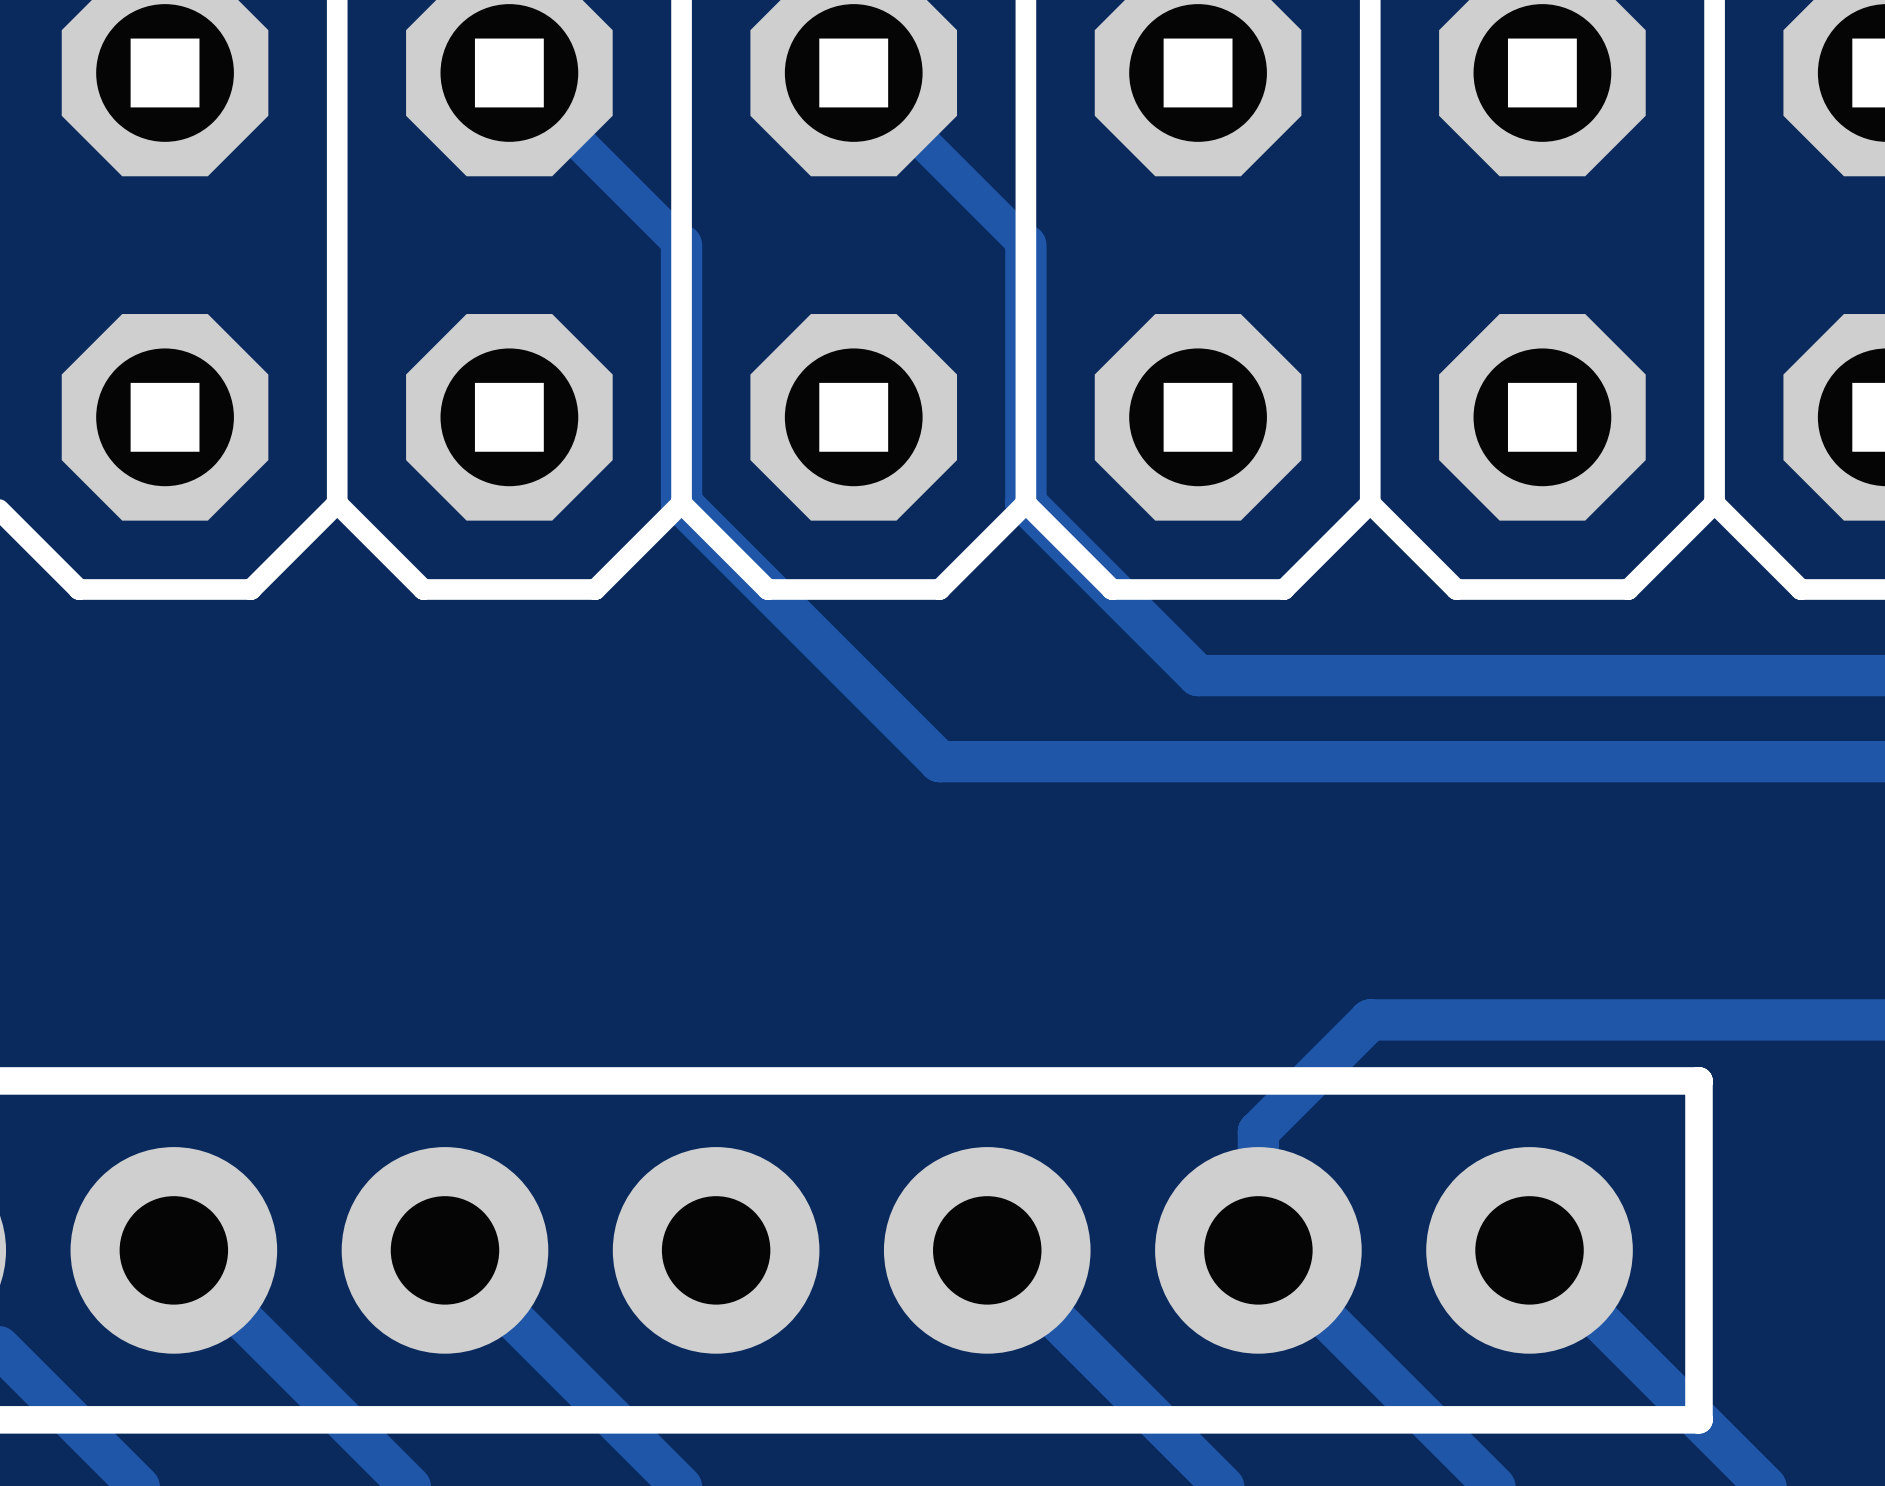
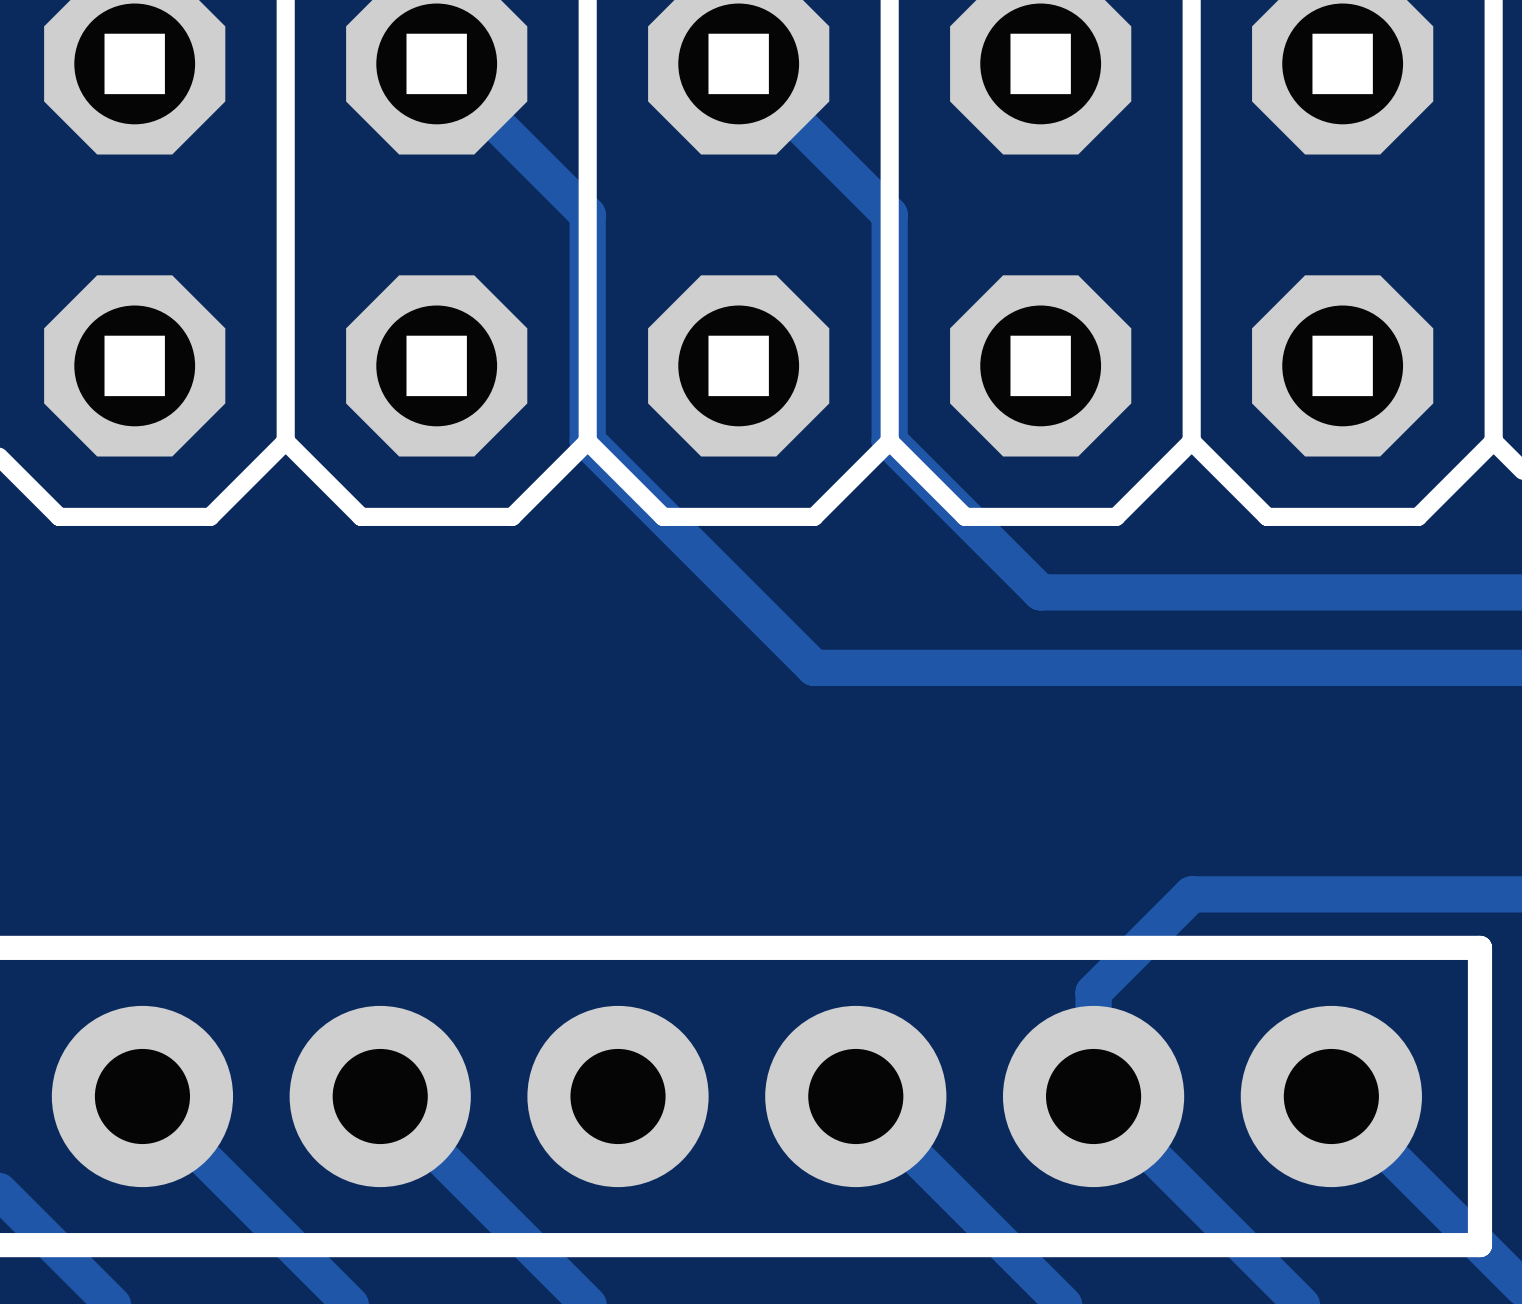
track width: thin (509, 72) (681, 245) -> thick (436, 63) (587, 214)
track width: thin (853, 72) (1025, 245) -> thick (738, 63) (889, 214)

